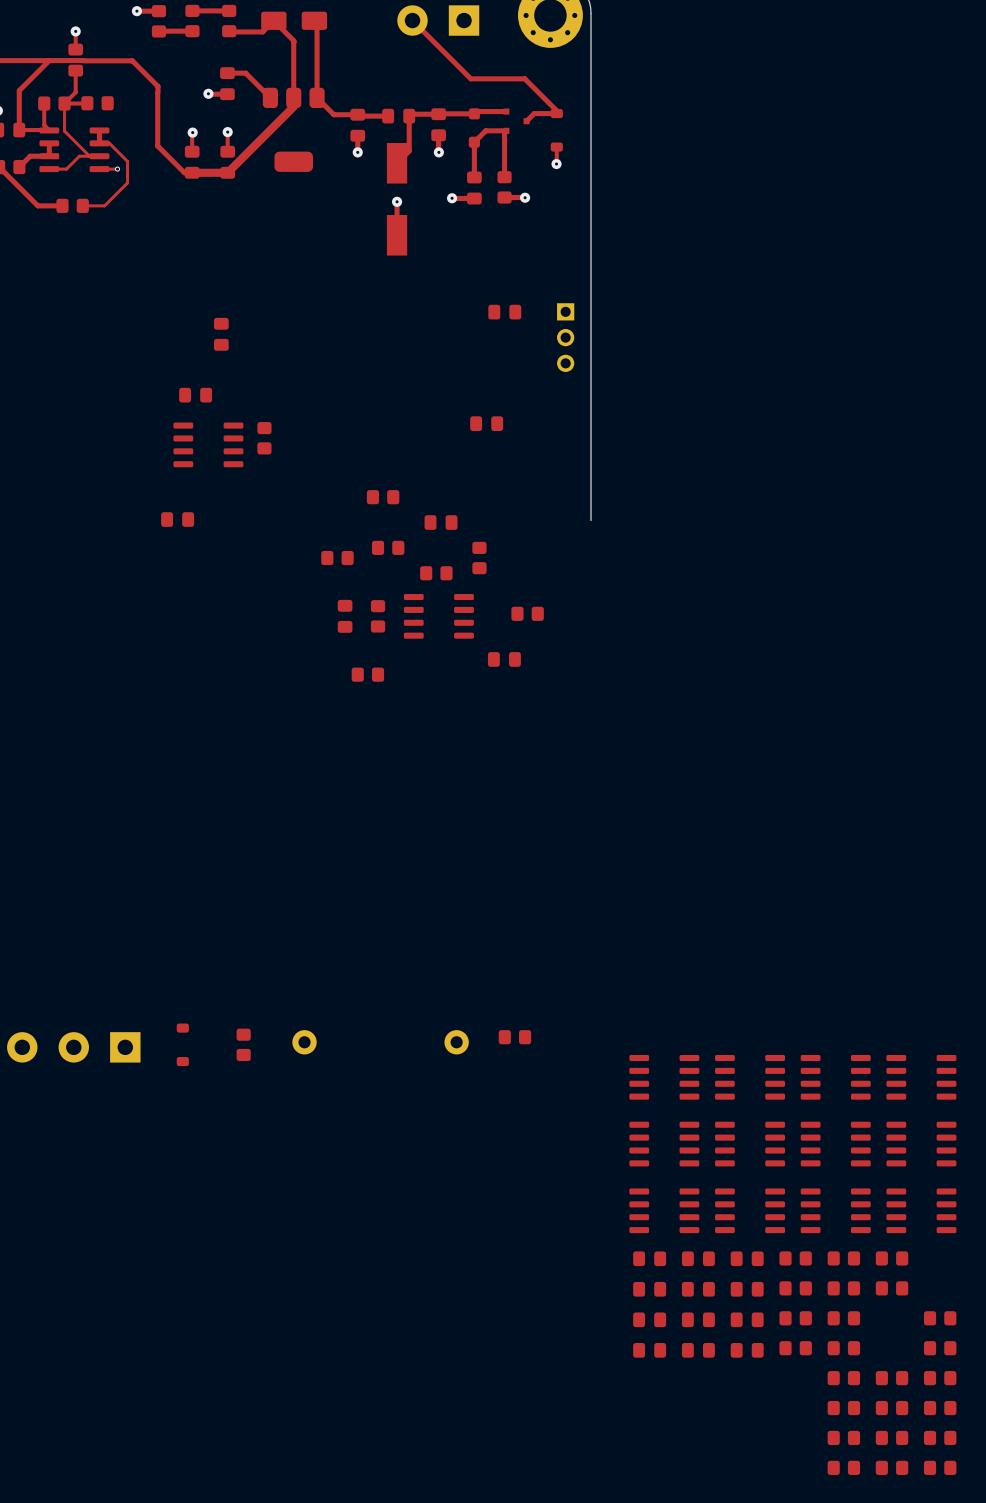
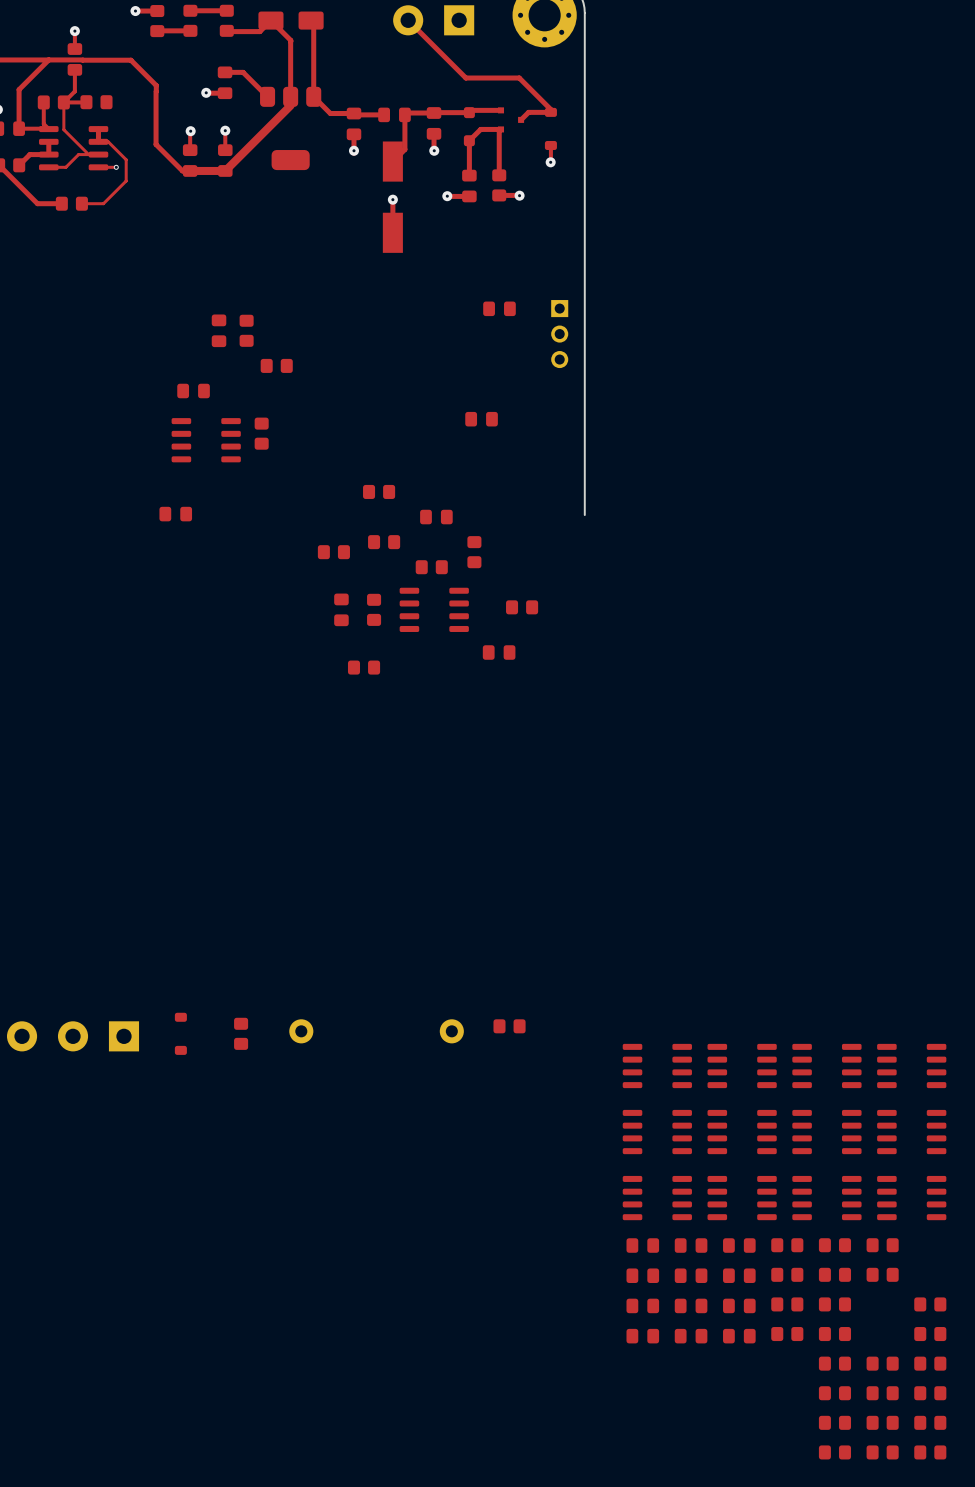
part: none -> (246, 330)
part: none -> (276, 365)

